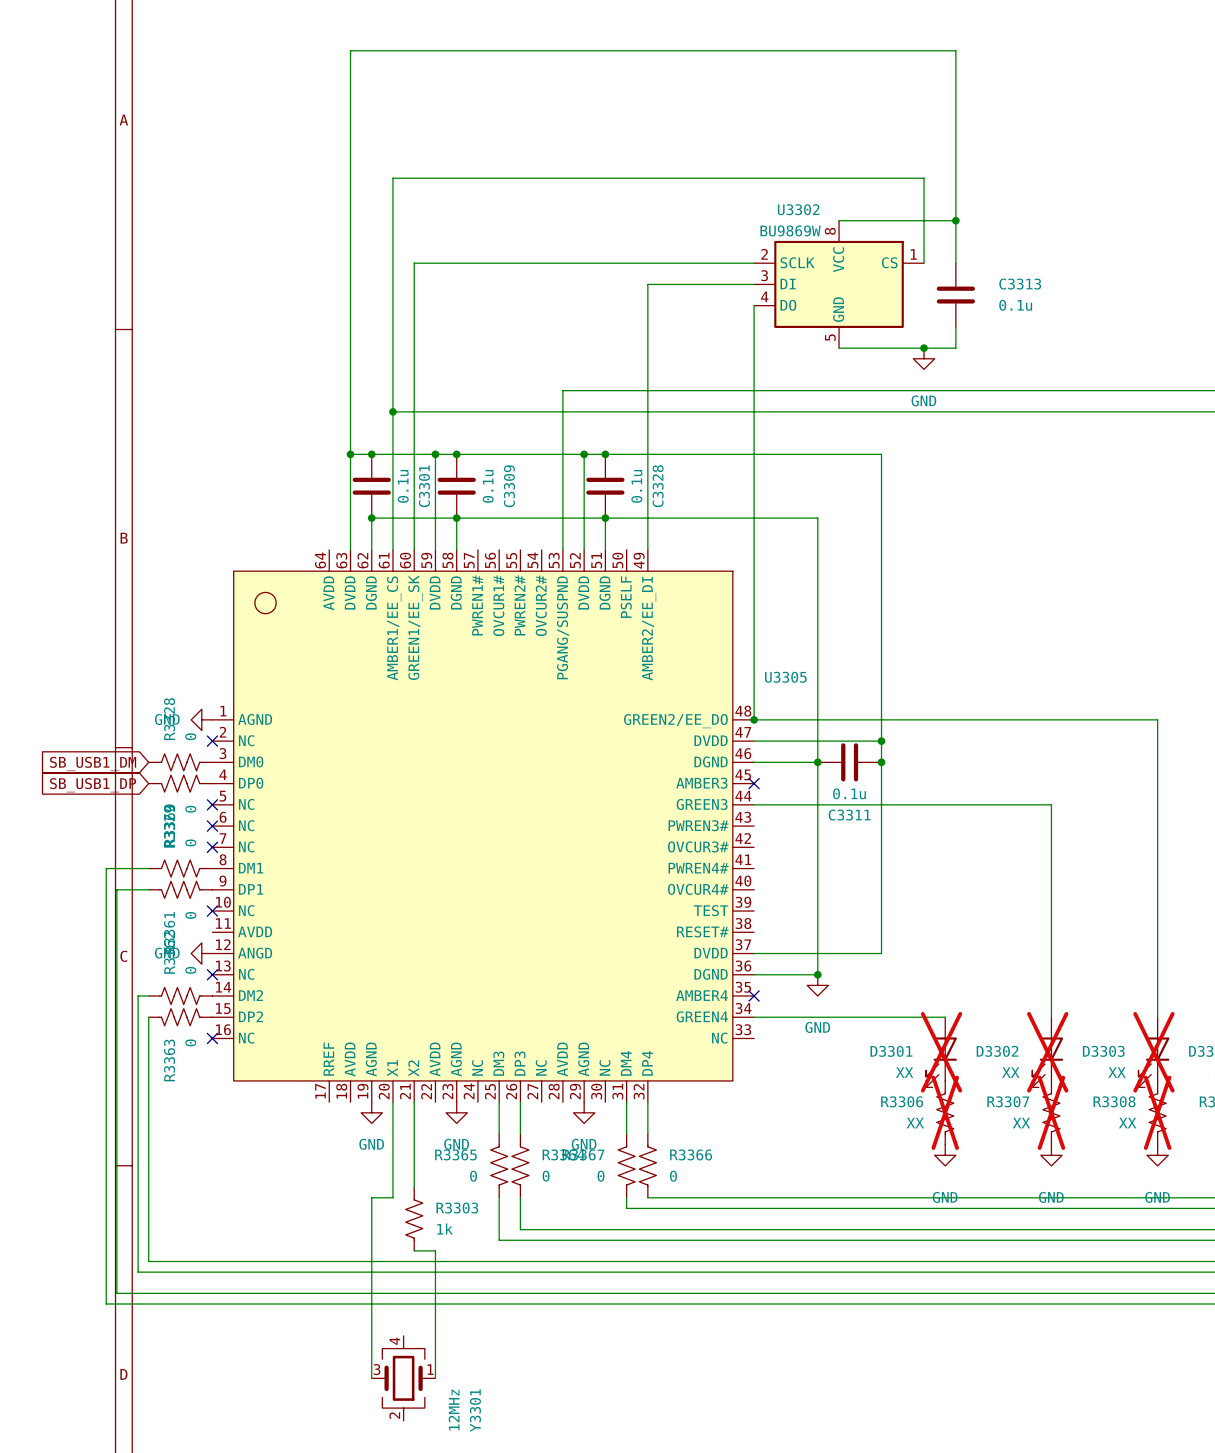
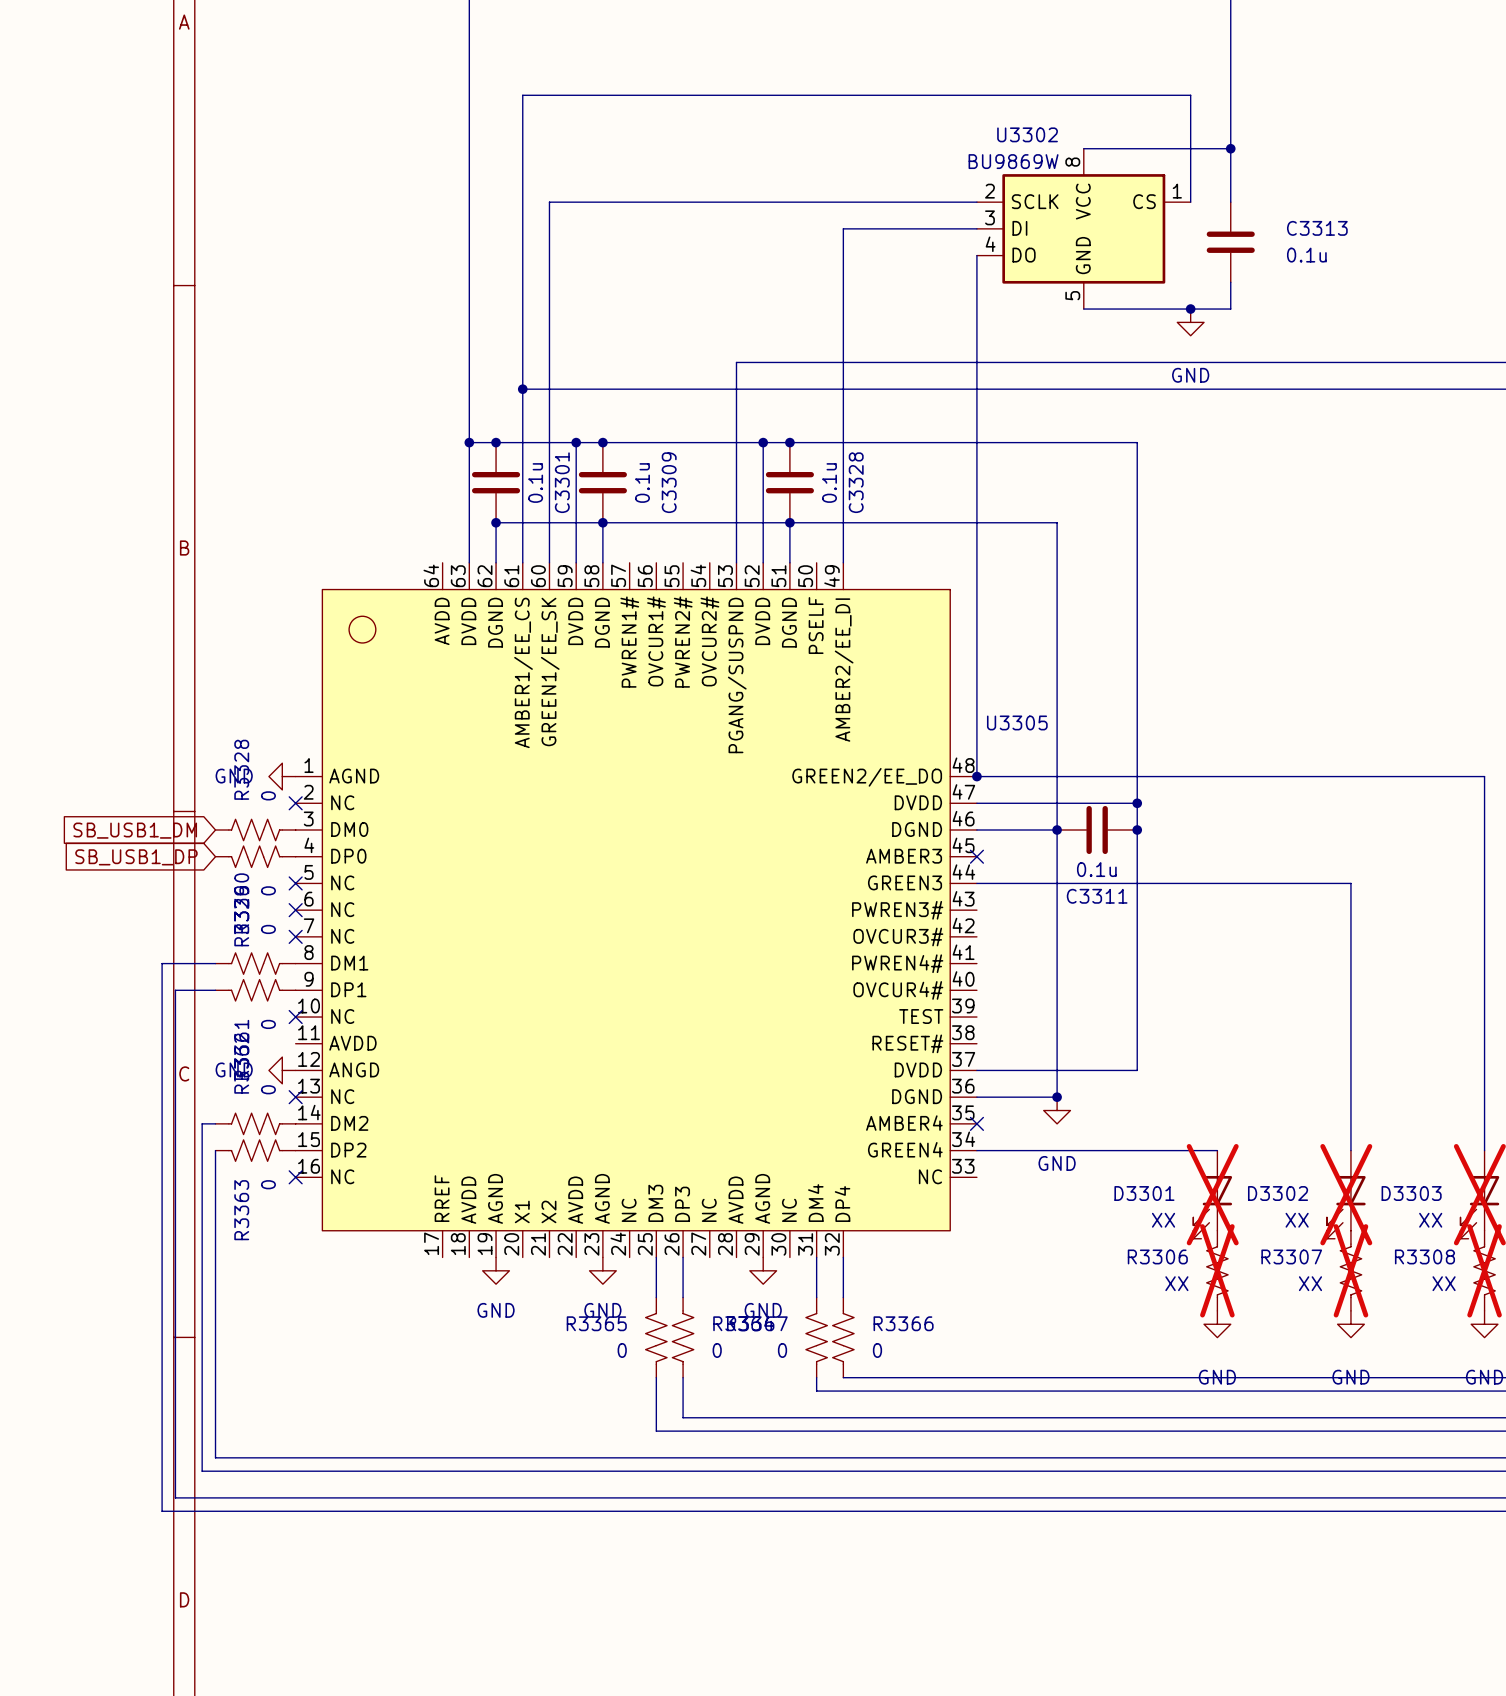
wire: (392, 1102) (392, 1197) (371, 1197) (371, 1378) -> none
wire: (414, 1102) (414, 1187) -> none
R3303: 1k (414, 1219) -> none
wire: (414, 1250) (435, 1250) (435, 1378) -> none
Y3301: 12MHz (403, 1378) -> none

